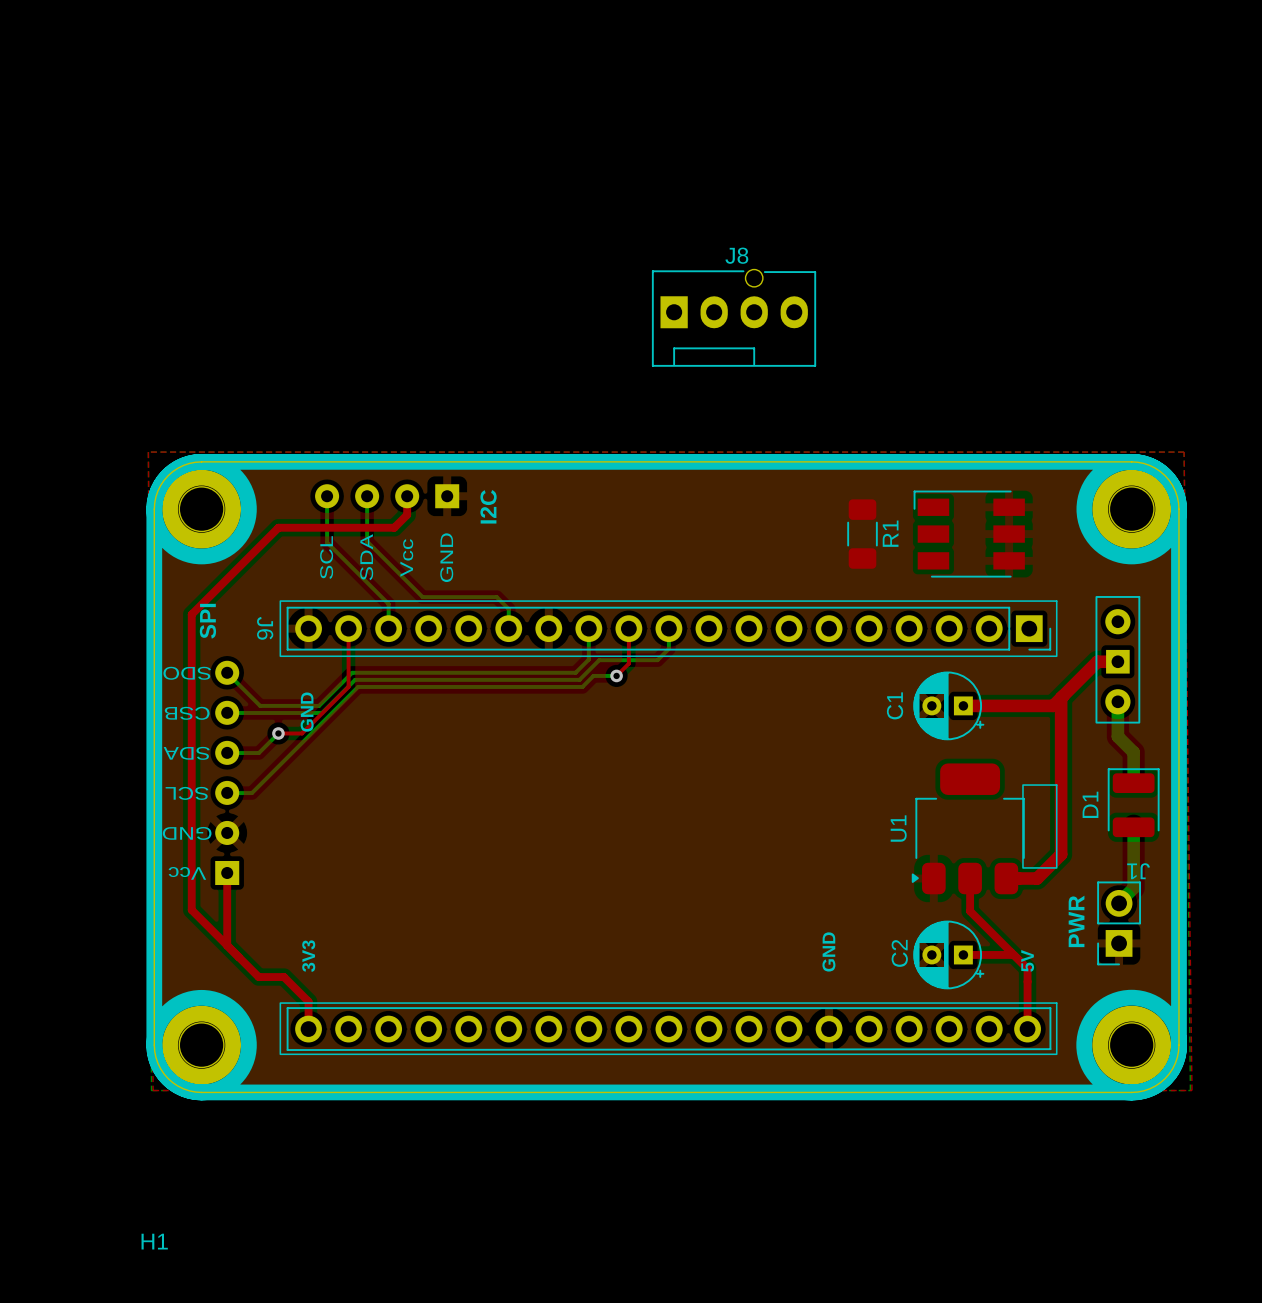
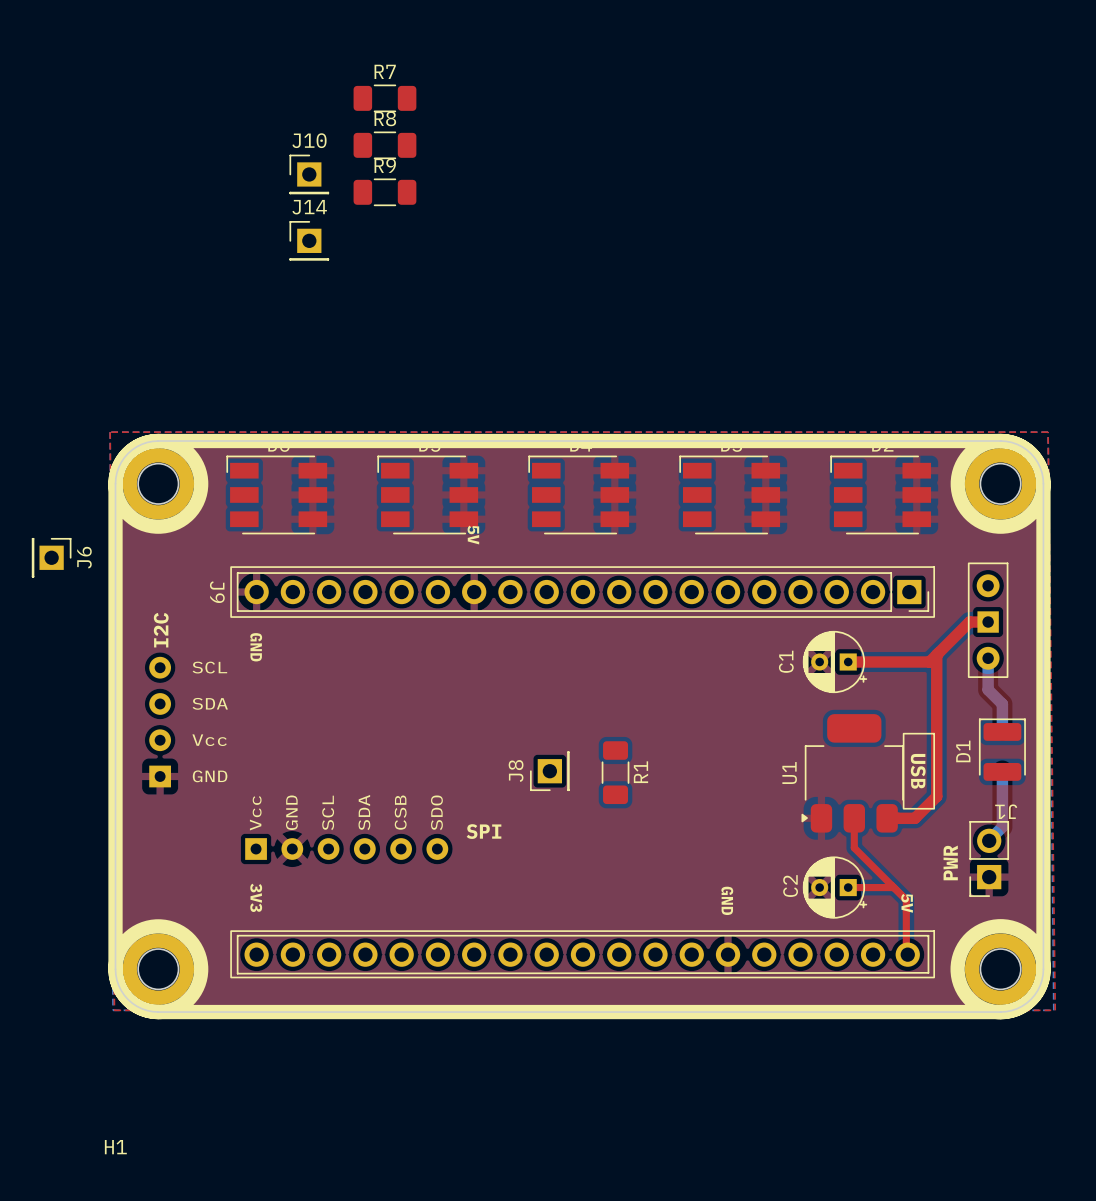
R7: none -> (384, 98)
R8: none -> (384, 145)
J10: none -> (309, 174)
R9: none -> (384, 192)
J14: none -> (309, 240)
J8 name position: J8 (736, 255) -> J8 (516, 771)
J8 footprint: [651, 269, 817, 367] -> [530, 751, 570, 792]
bottom track: (327, 496) (327, 542) (388, 604) (388, 628) -> none
bottom track: (367, 496) (367, 541) (422, 597) (496, 597) (508, 609) (508, 628) -> none
part: (387, 496) -> none
top track: (407, 496) (407, 514) (394, 527) (278, 527) (191, 614) (191, 910) (258, 977) (283, 977) (308, 1001) (308, 1029) -> none
part: none -> (276, 494)
part: none -> (427, 494)
part: none -> (578, 494)
part: none -> (729, 494)
part: none -> (880, 494)
R1 position: (862, 534) -> (615, 772)
part: (969, 534) -> none
J6 footprint: [279, 600, 1058, 1056] -> [31, 537, 72, 578]
J6 name position: J6 (265, 628) -> J6 (84, 557)
top track: (348, 628) (348, 686) (302, 733) (278, 733) -> none
bottom track: (588, 628) (588, 659) (575, 672) (352, 672) (319, 705) (260, 705) (227, 672) -> none
top track: (628, 628) (628, 663) (616, 675) -> none
bottom track: (668, 628) (668, 648) (657, 660) (599, 660) (579, 679) (355, 679) (322, 712) (227, 712) -> none
bottom track: (616, 675) (593, 675) (582, 686) (358, 686) (251, 793) (227, 793) -> none
via: (616, 675) -> none
bottom track: (278, 733) (258, 753) (227, 753) -> none
via: (278, 733) -> none
part: none -> (160, 722)
part rotation: 0° (227, 772) -> 90° clockwise (346, 849)
part position: (227, 772) -> (346, 849)
J9: none -> (582, 772)
top track: (227, 873) (227, 945) -> none

